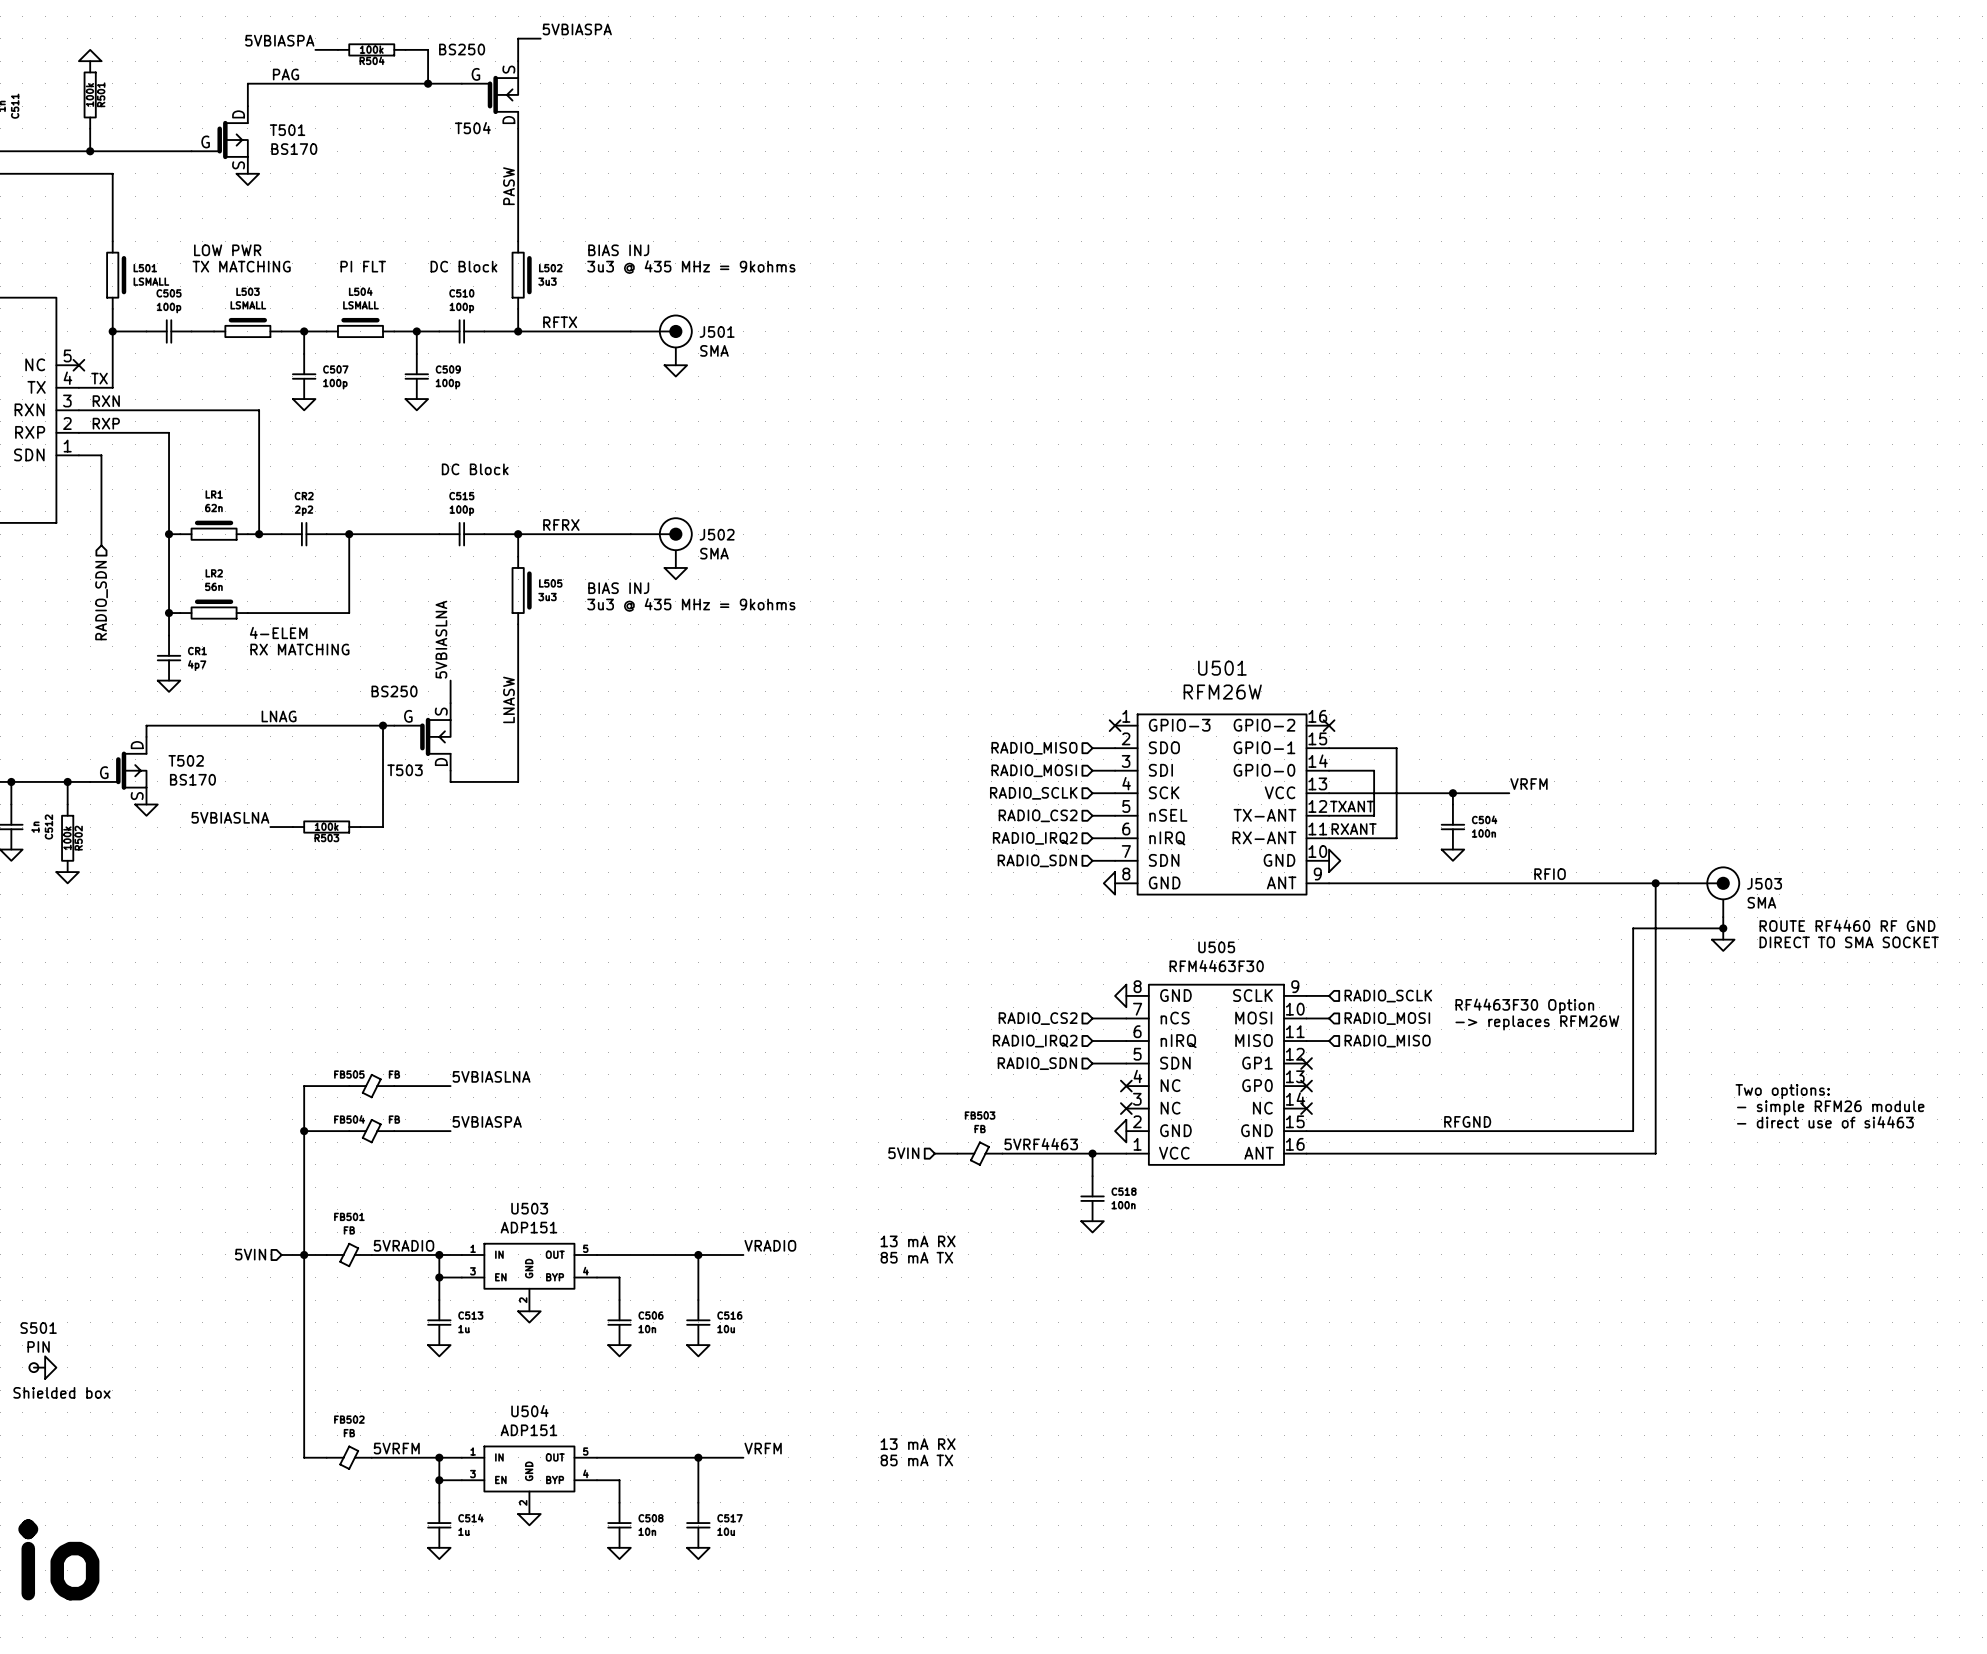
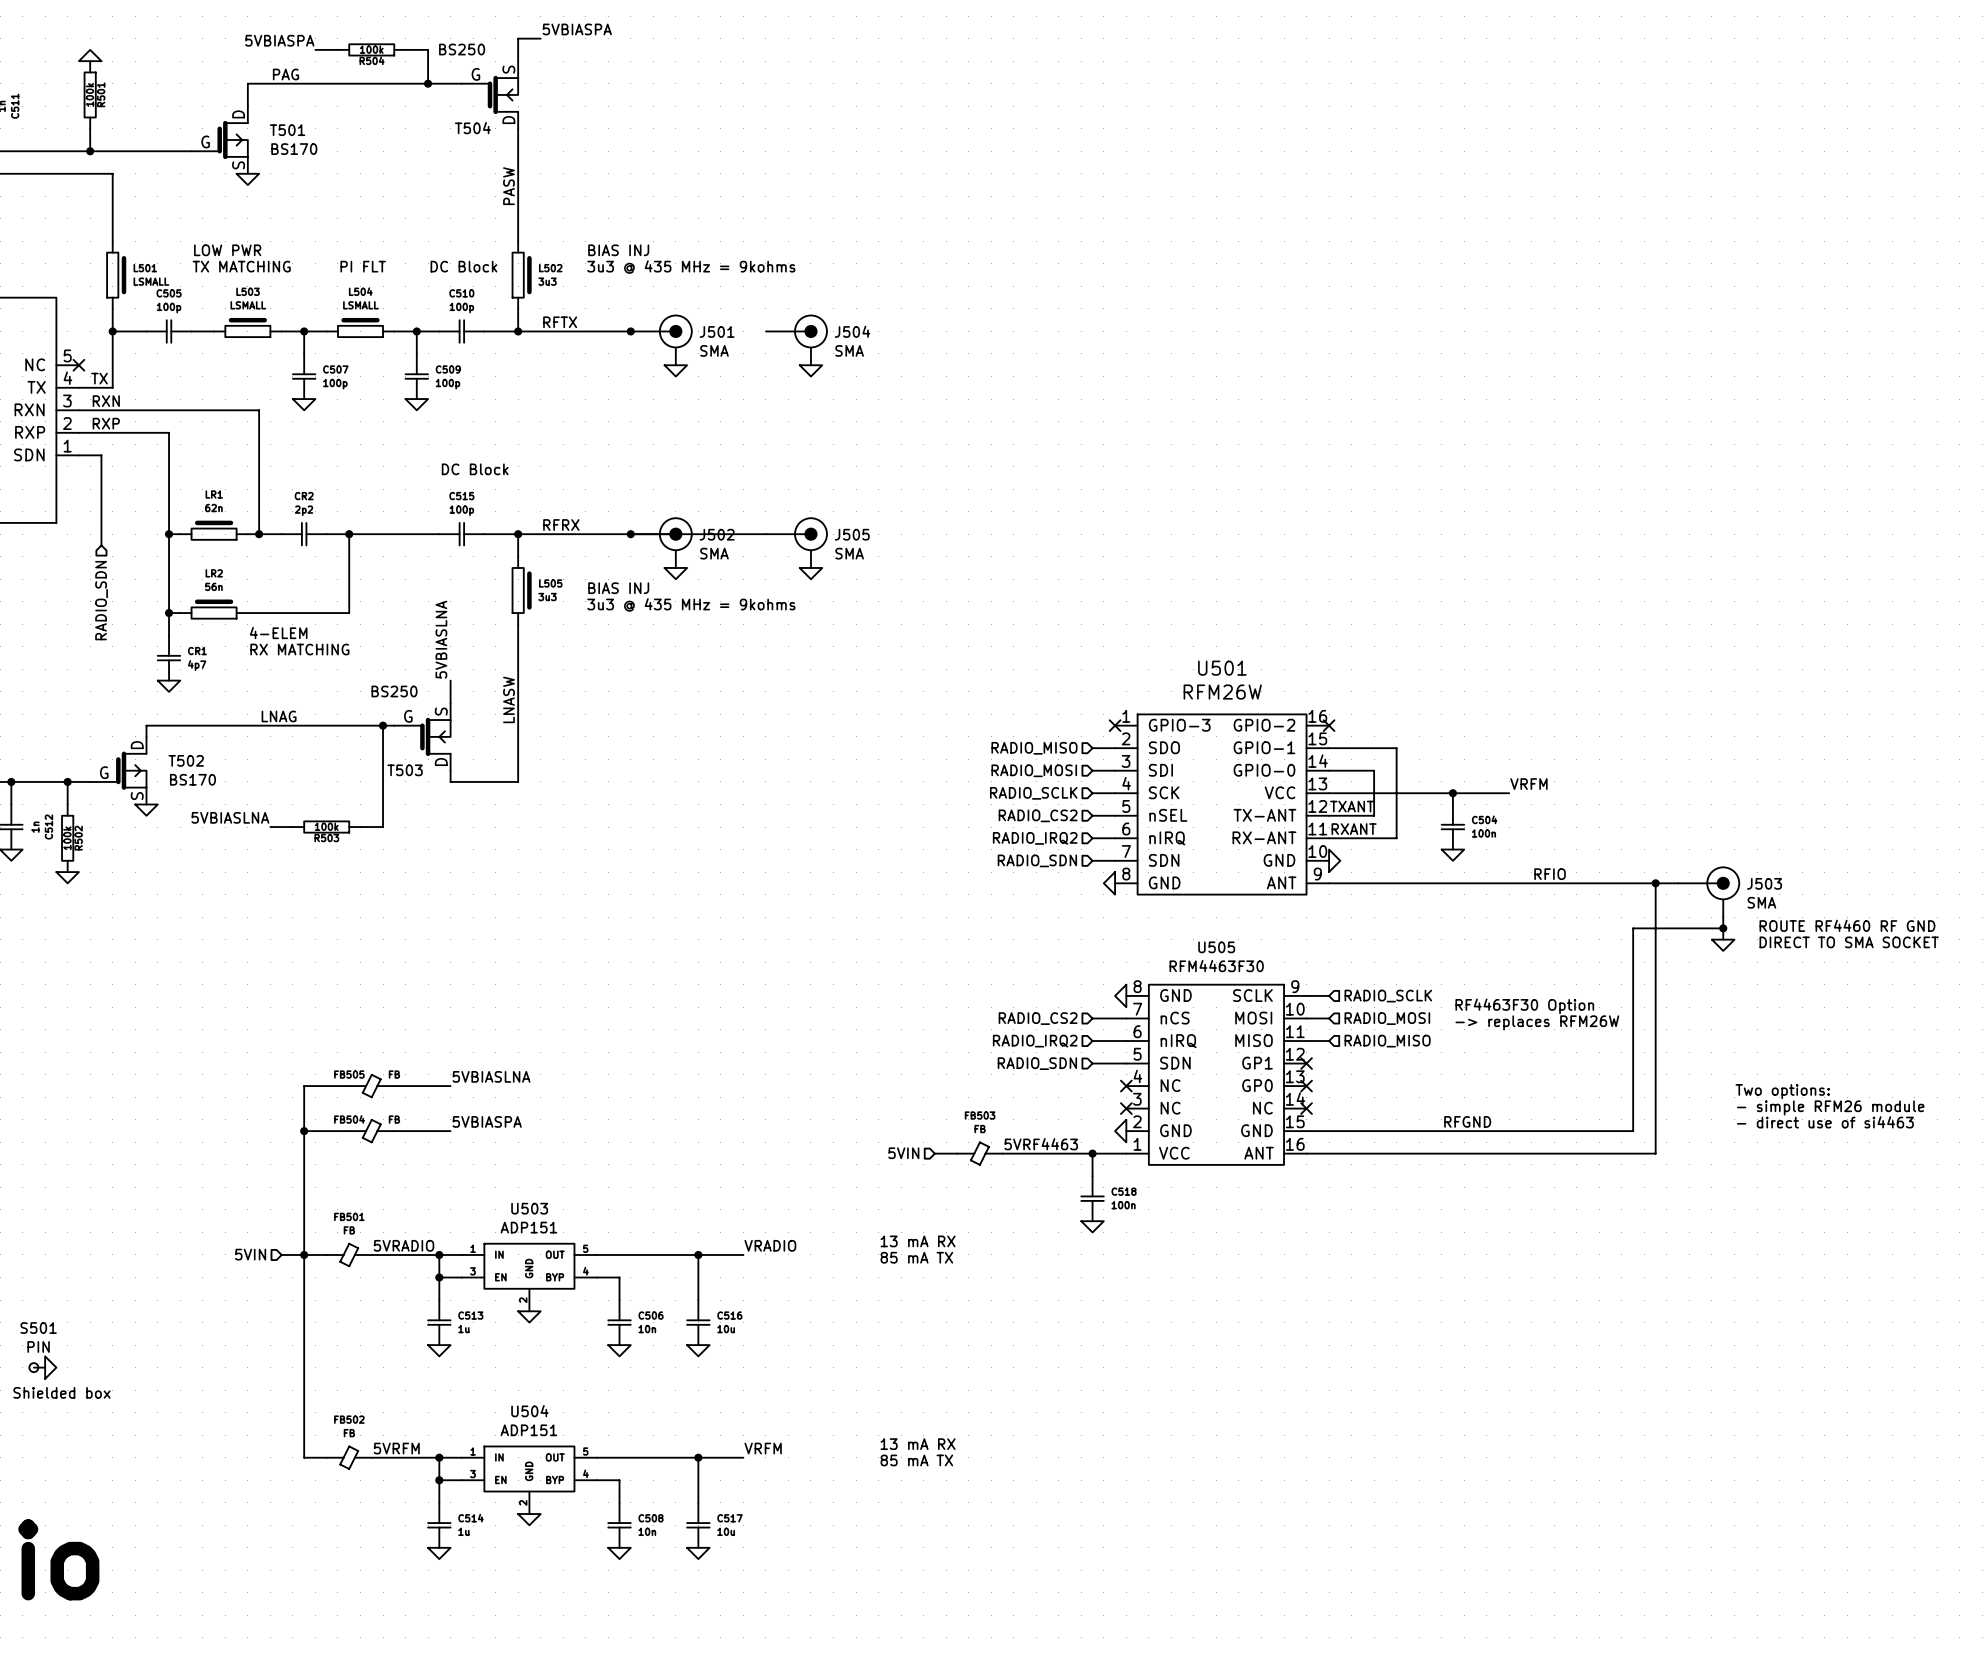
junction: none -> (630, 331)
J504: none -> SMA (796, 340)
power symbol: none -> (810, 370)
wire: none -> (630, 534) (765, 534)
junction: none -> (630, 534)
J505: none -> SMA (796, 543)
power symbol: none -> (810, 573)

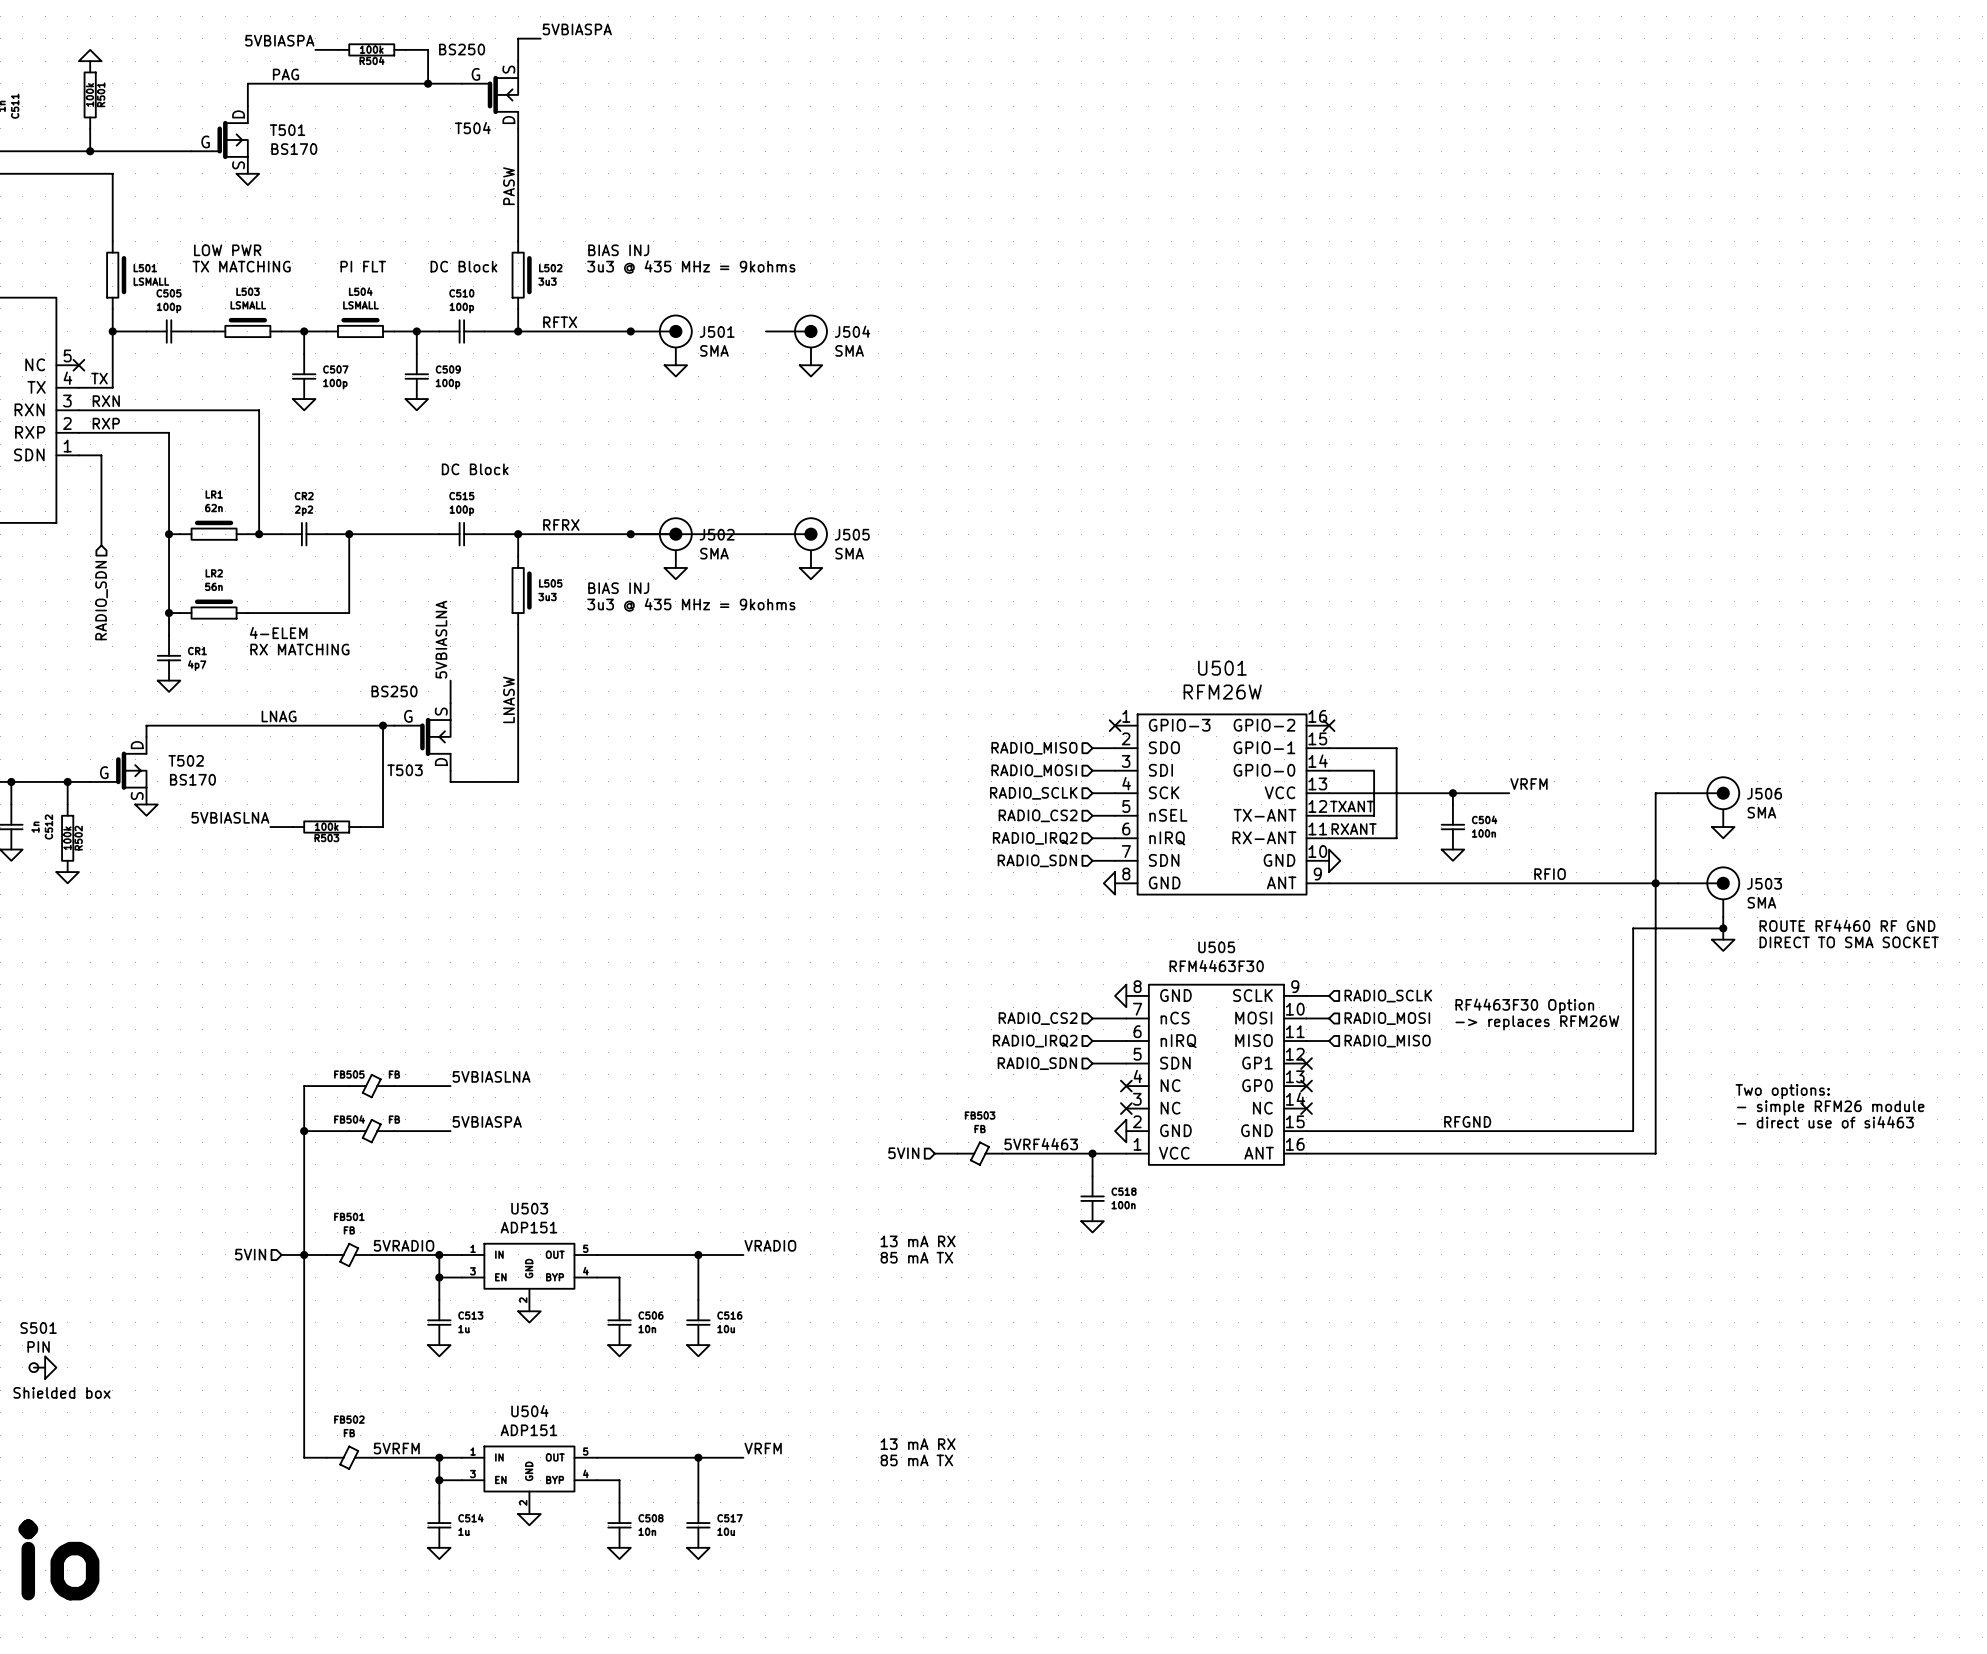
wire: none -> (1678, 793) (1655, 793) (1655, 883)
J506: none -> SMA (1708, 802)
power symbol: none -> (1723, 832)

